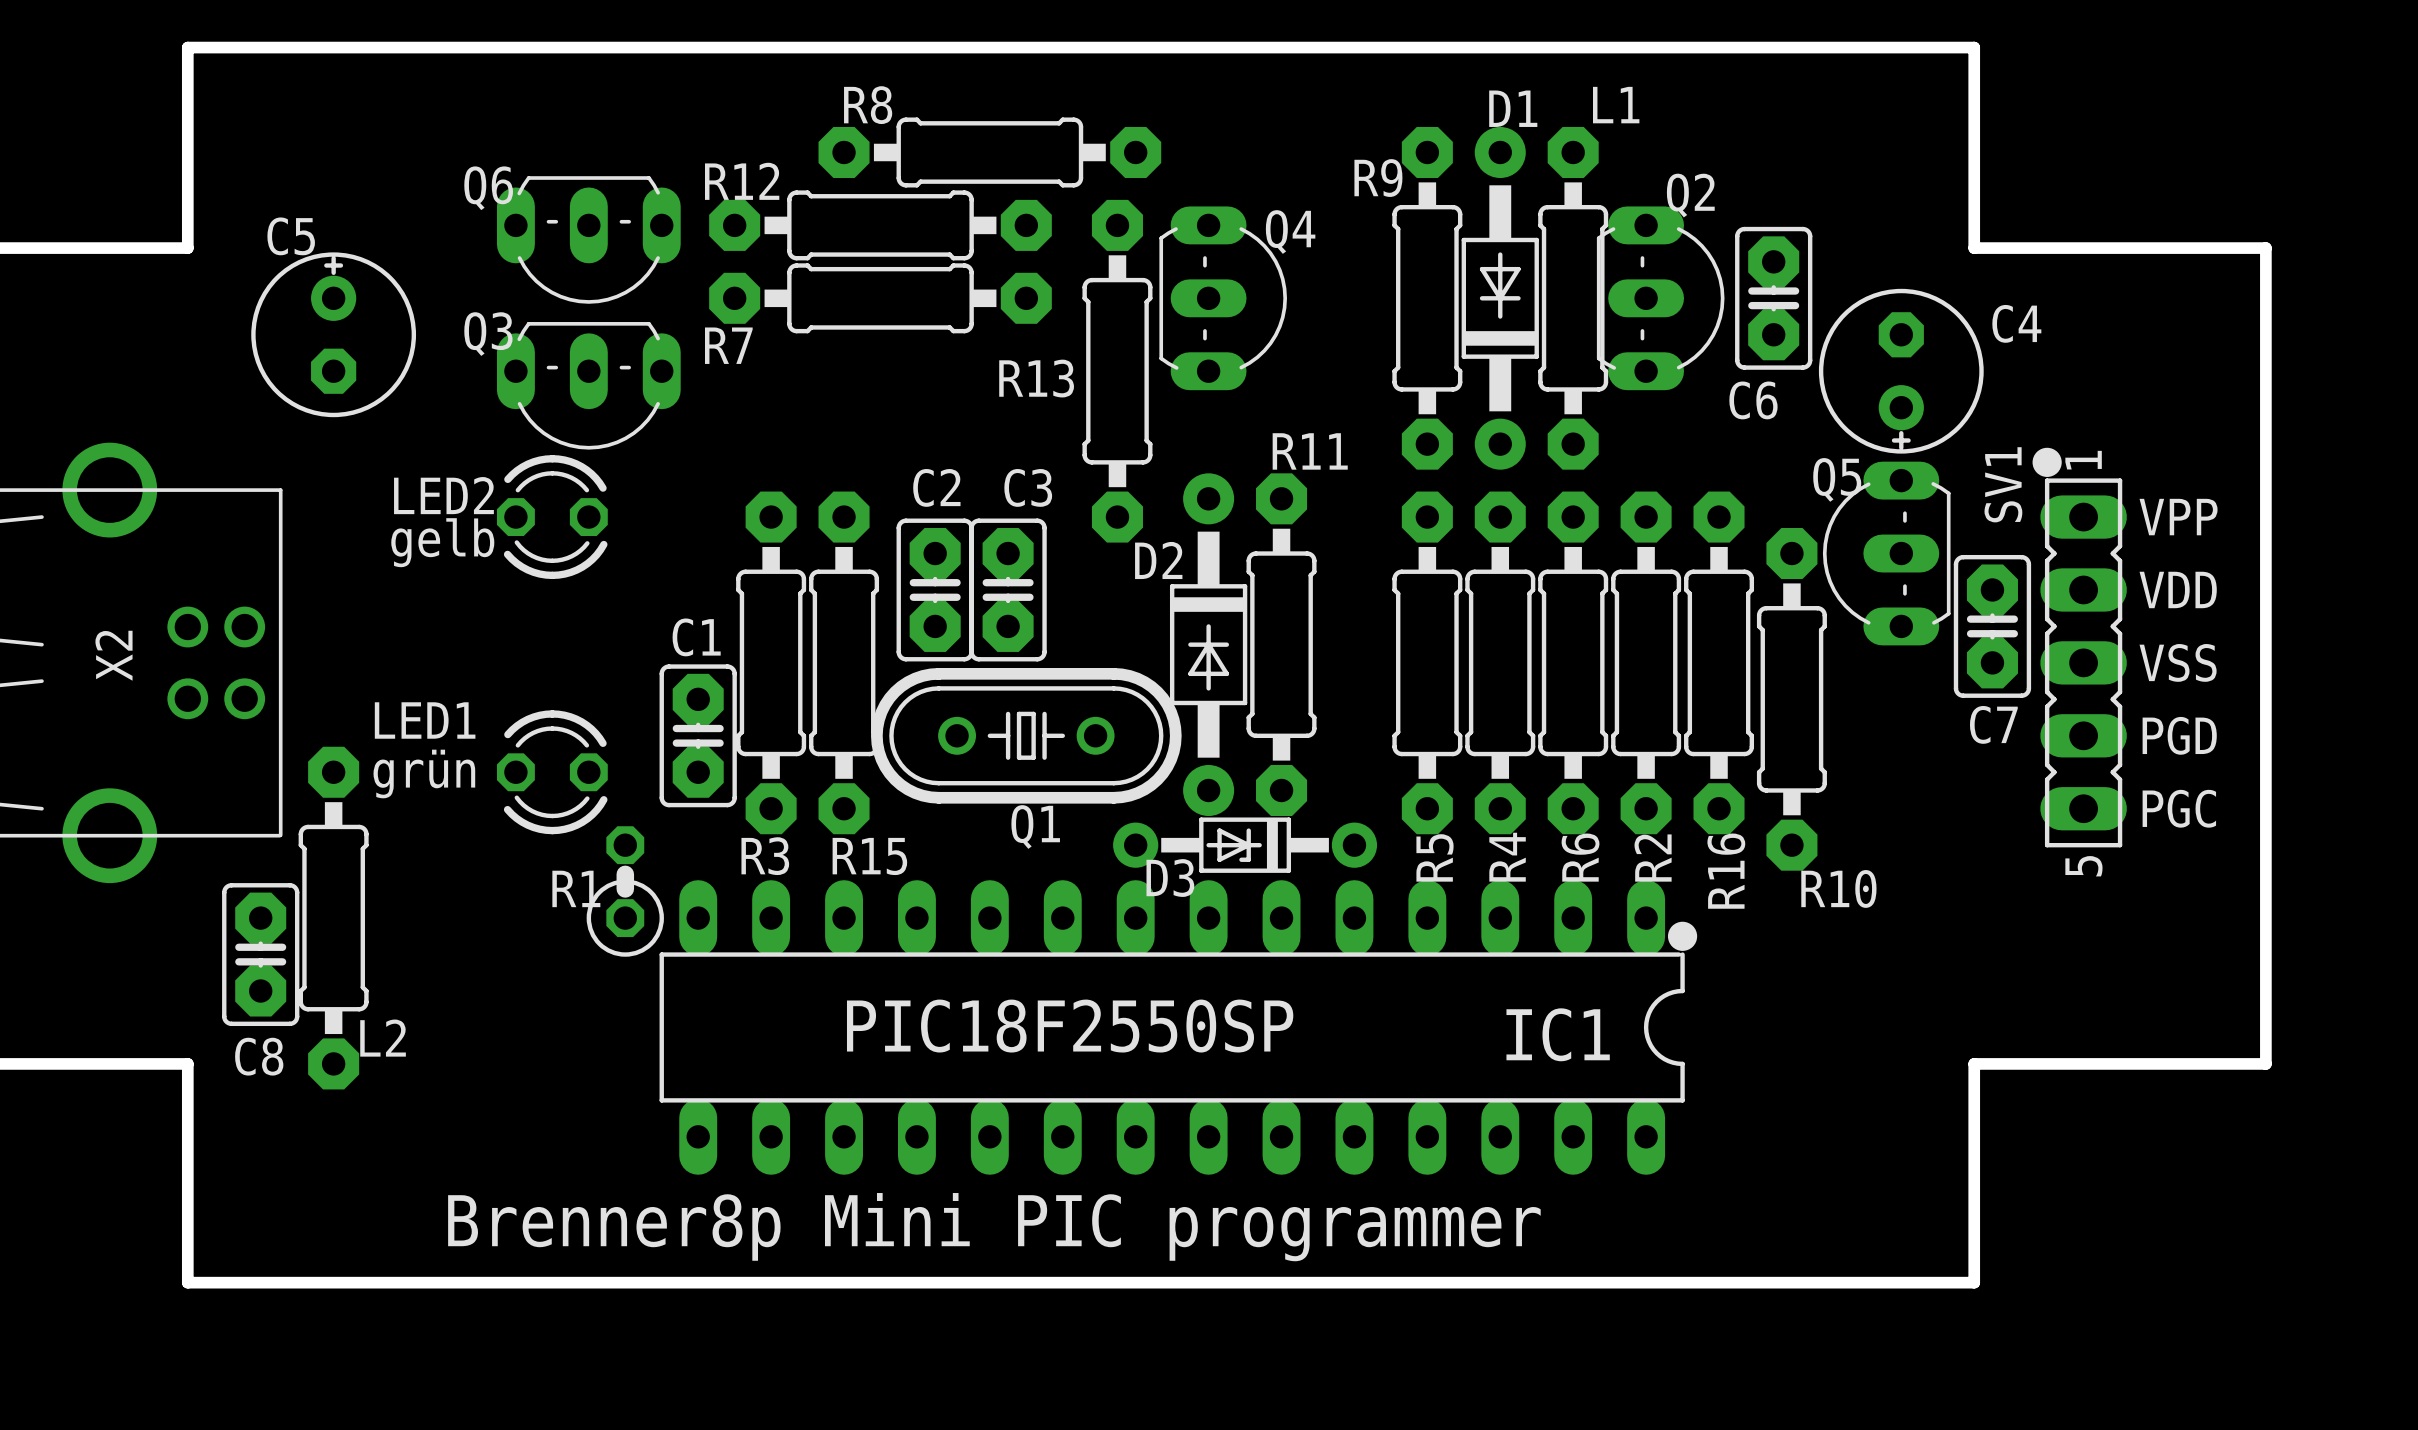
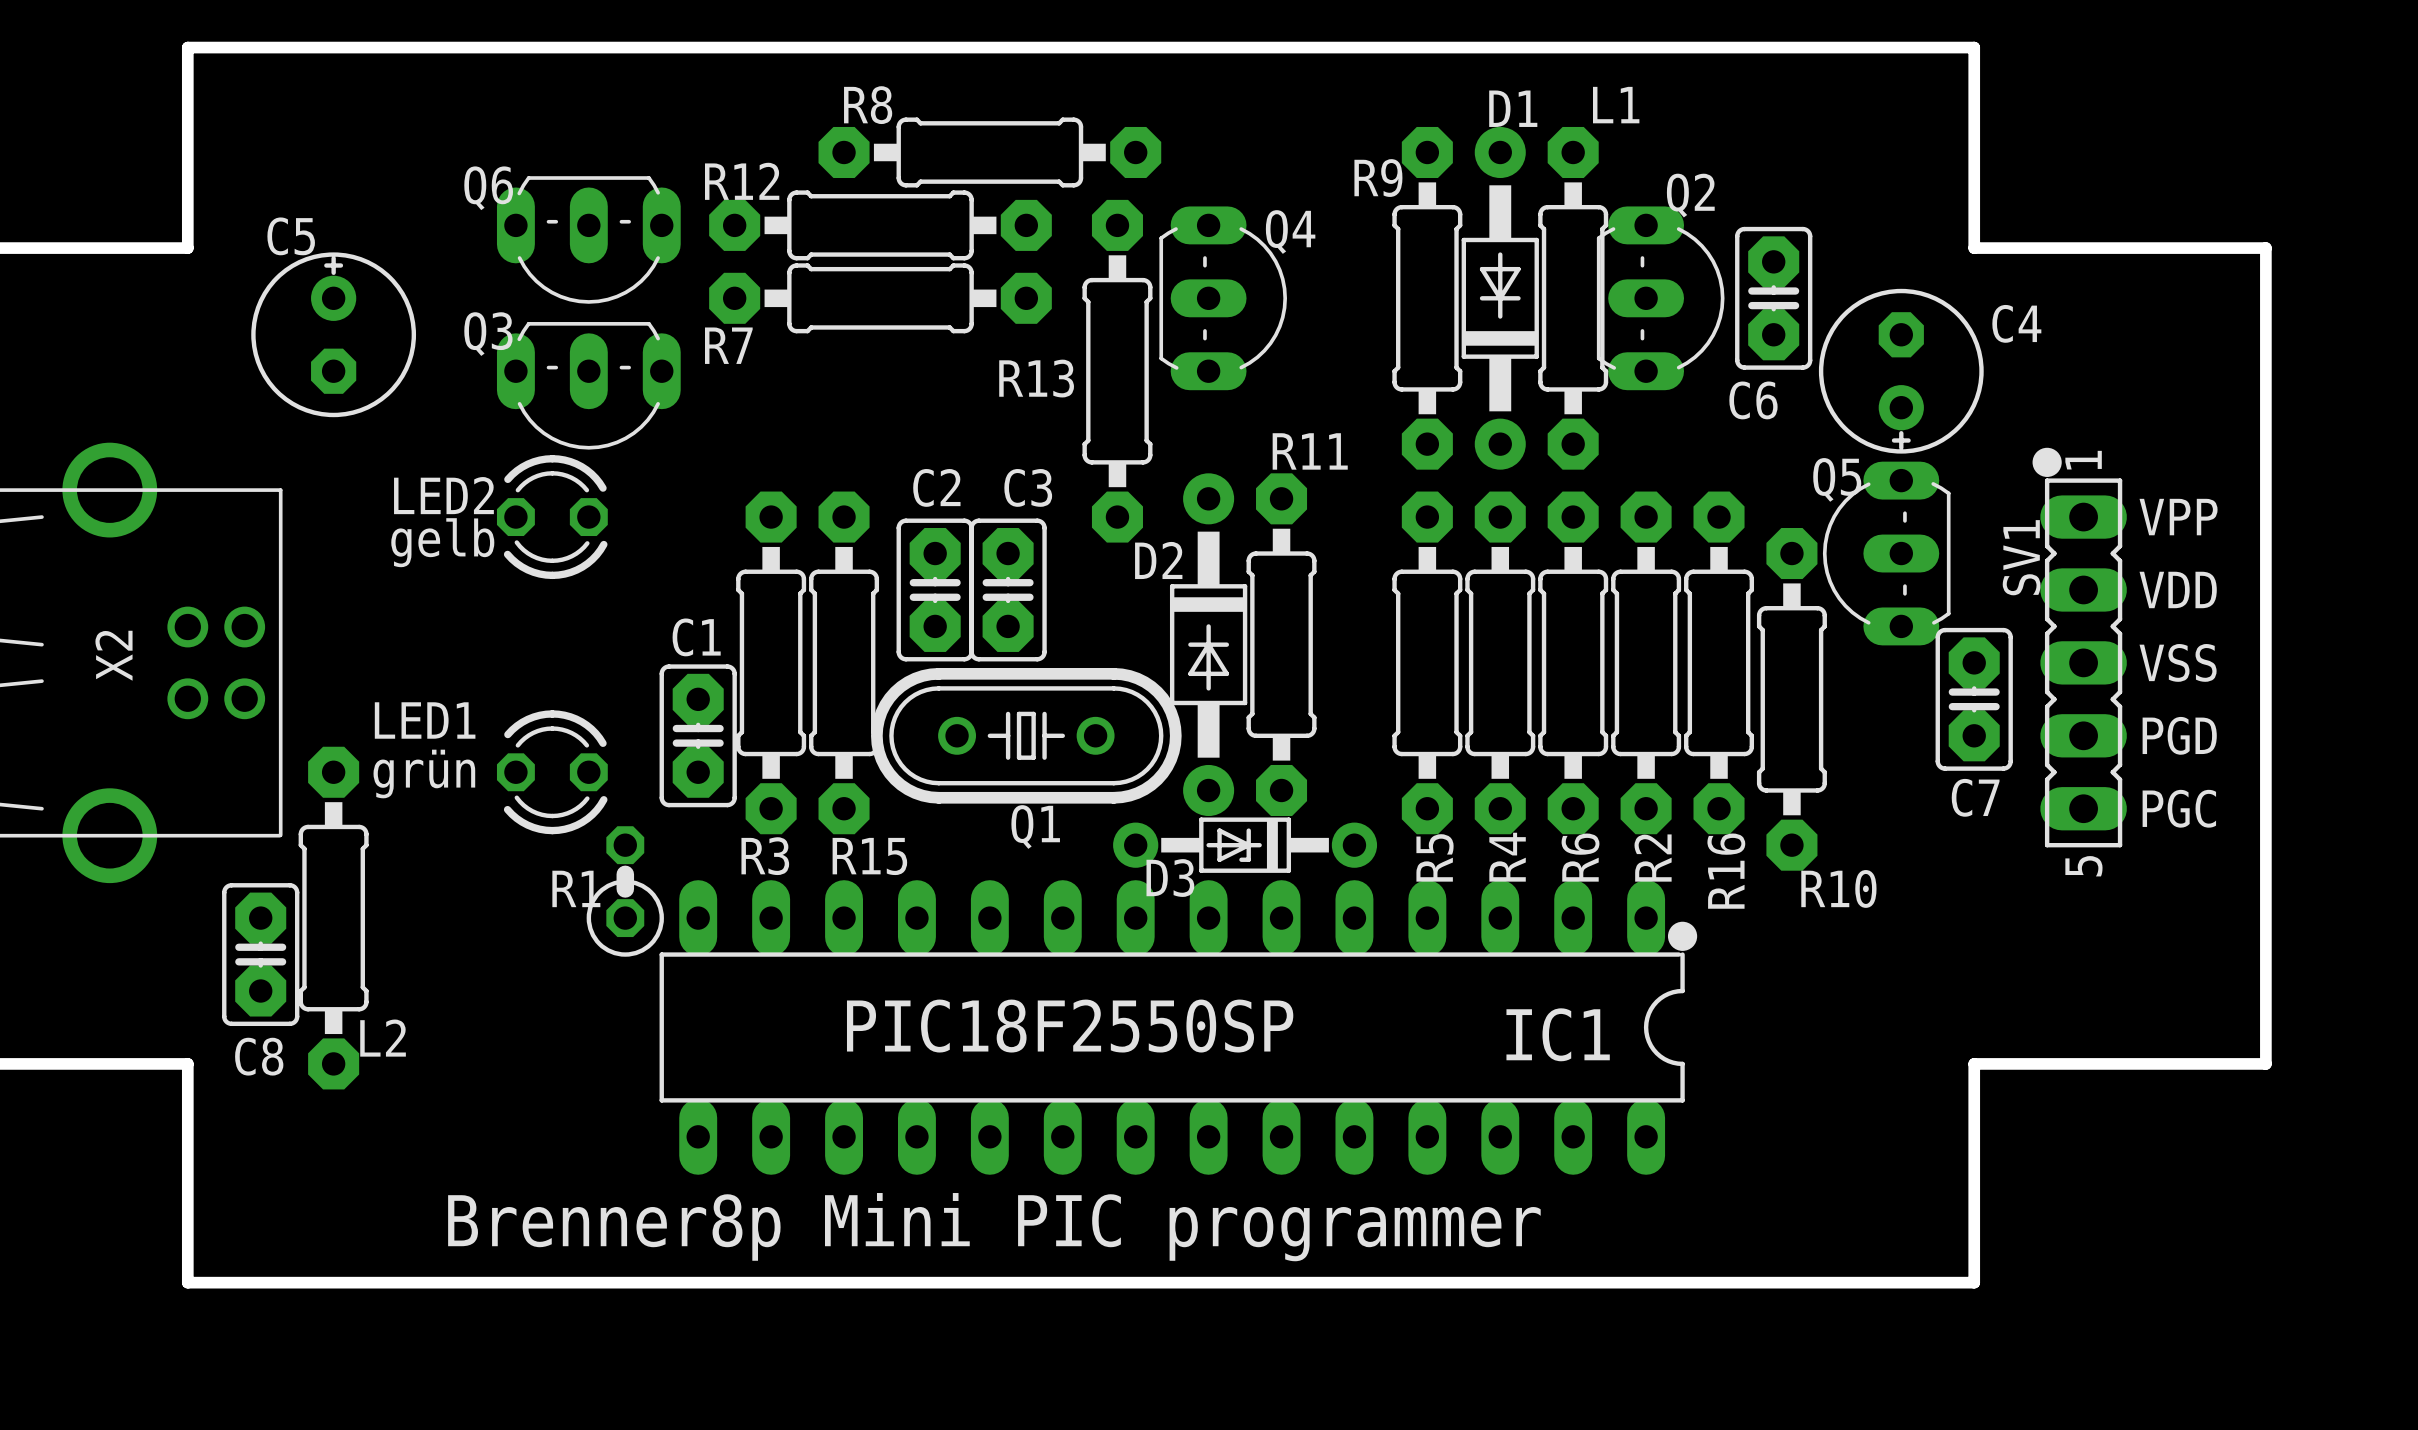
SV1 name position: SV1 (2003, 484) -> SV1 (2021, 557)
C7 position: (1992, 626) -> (1974, 699)

